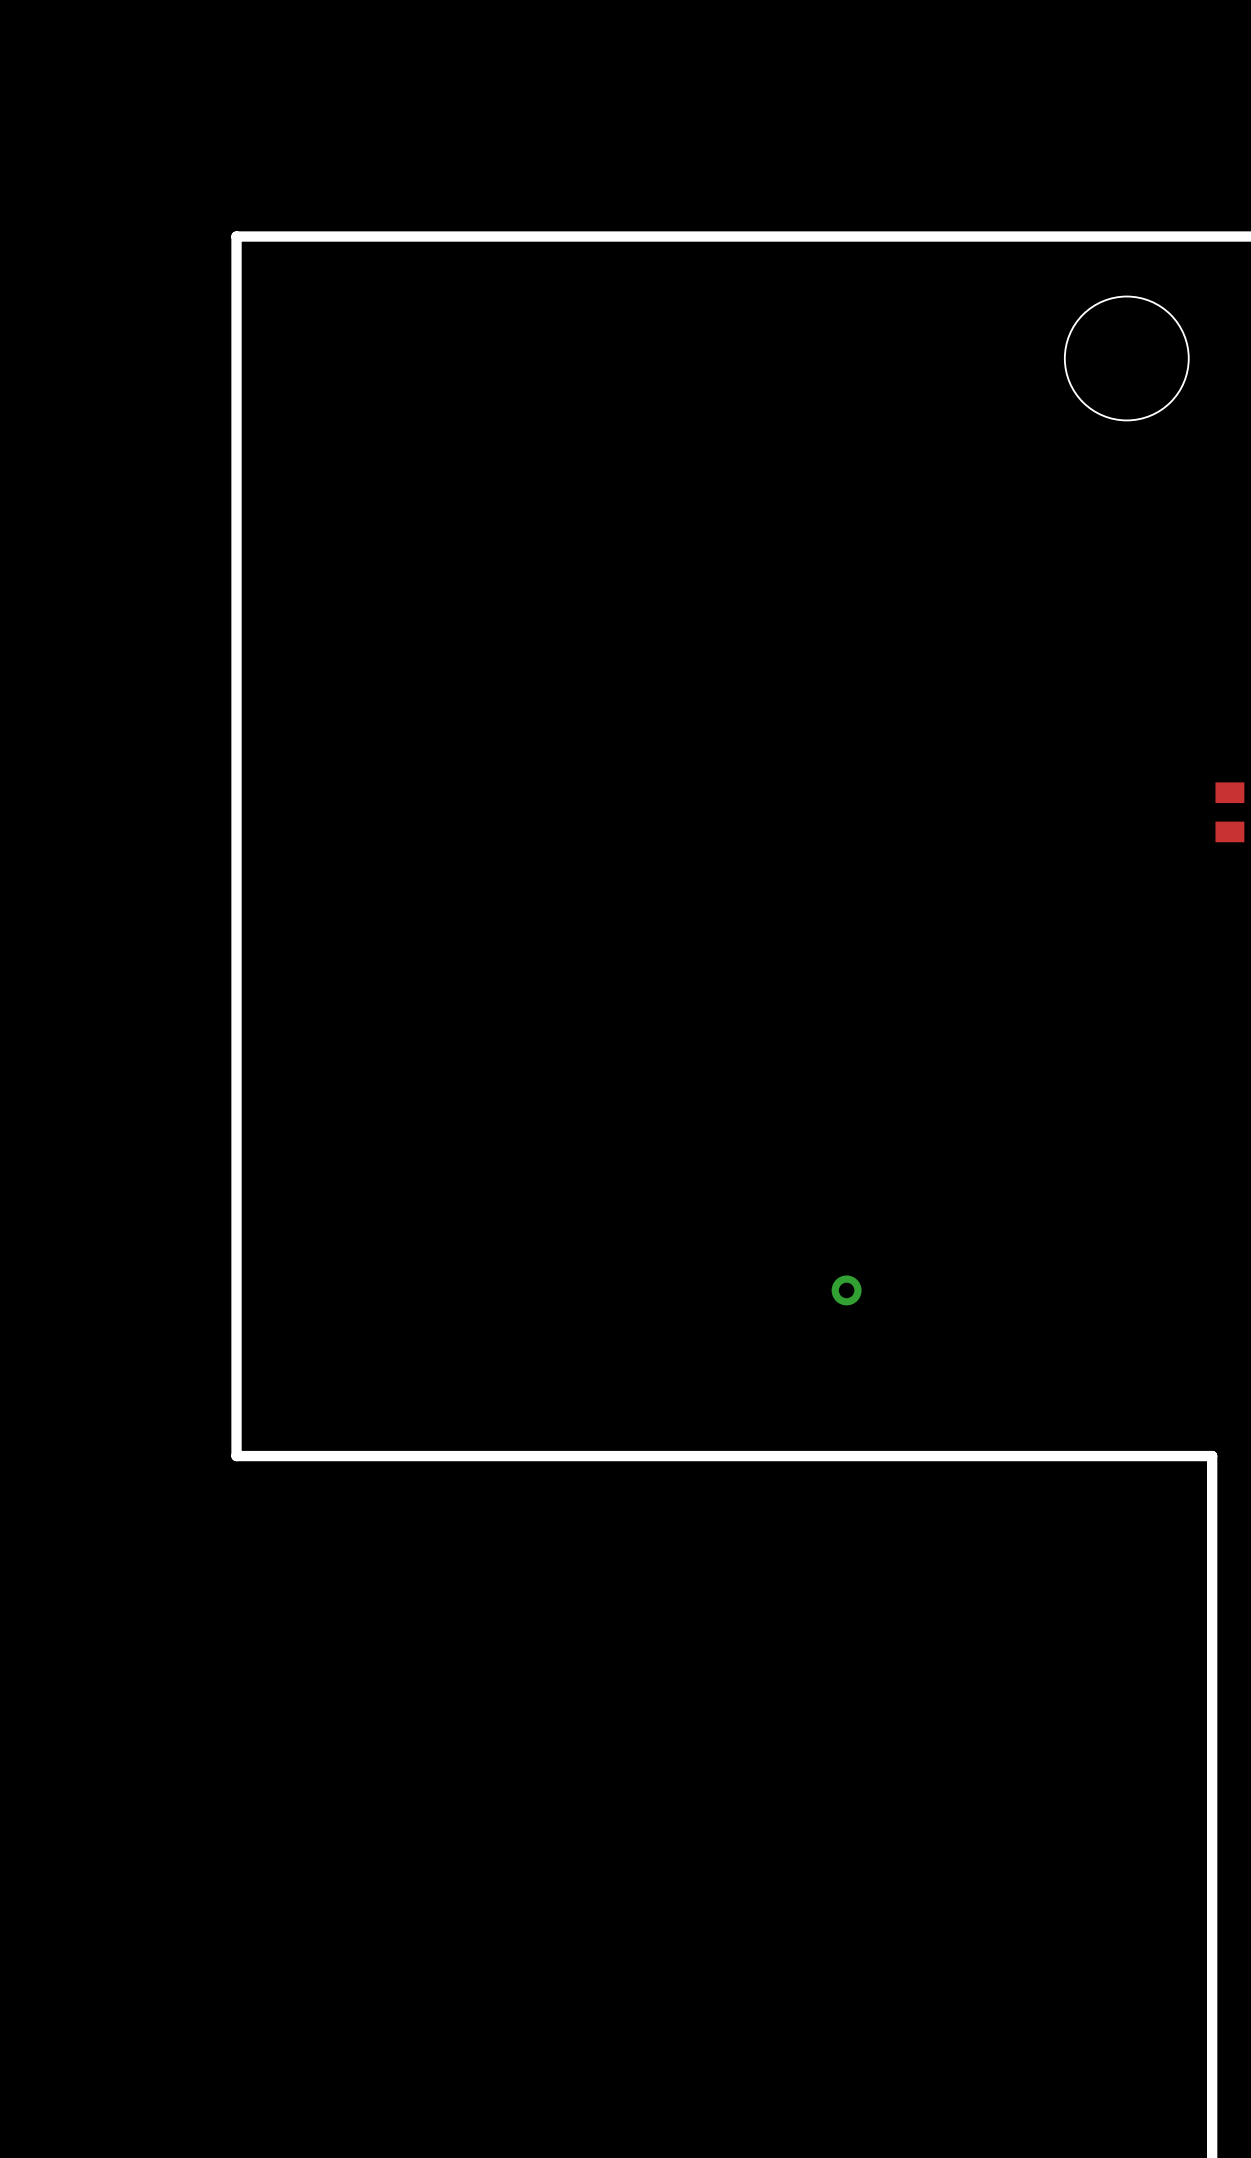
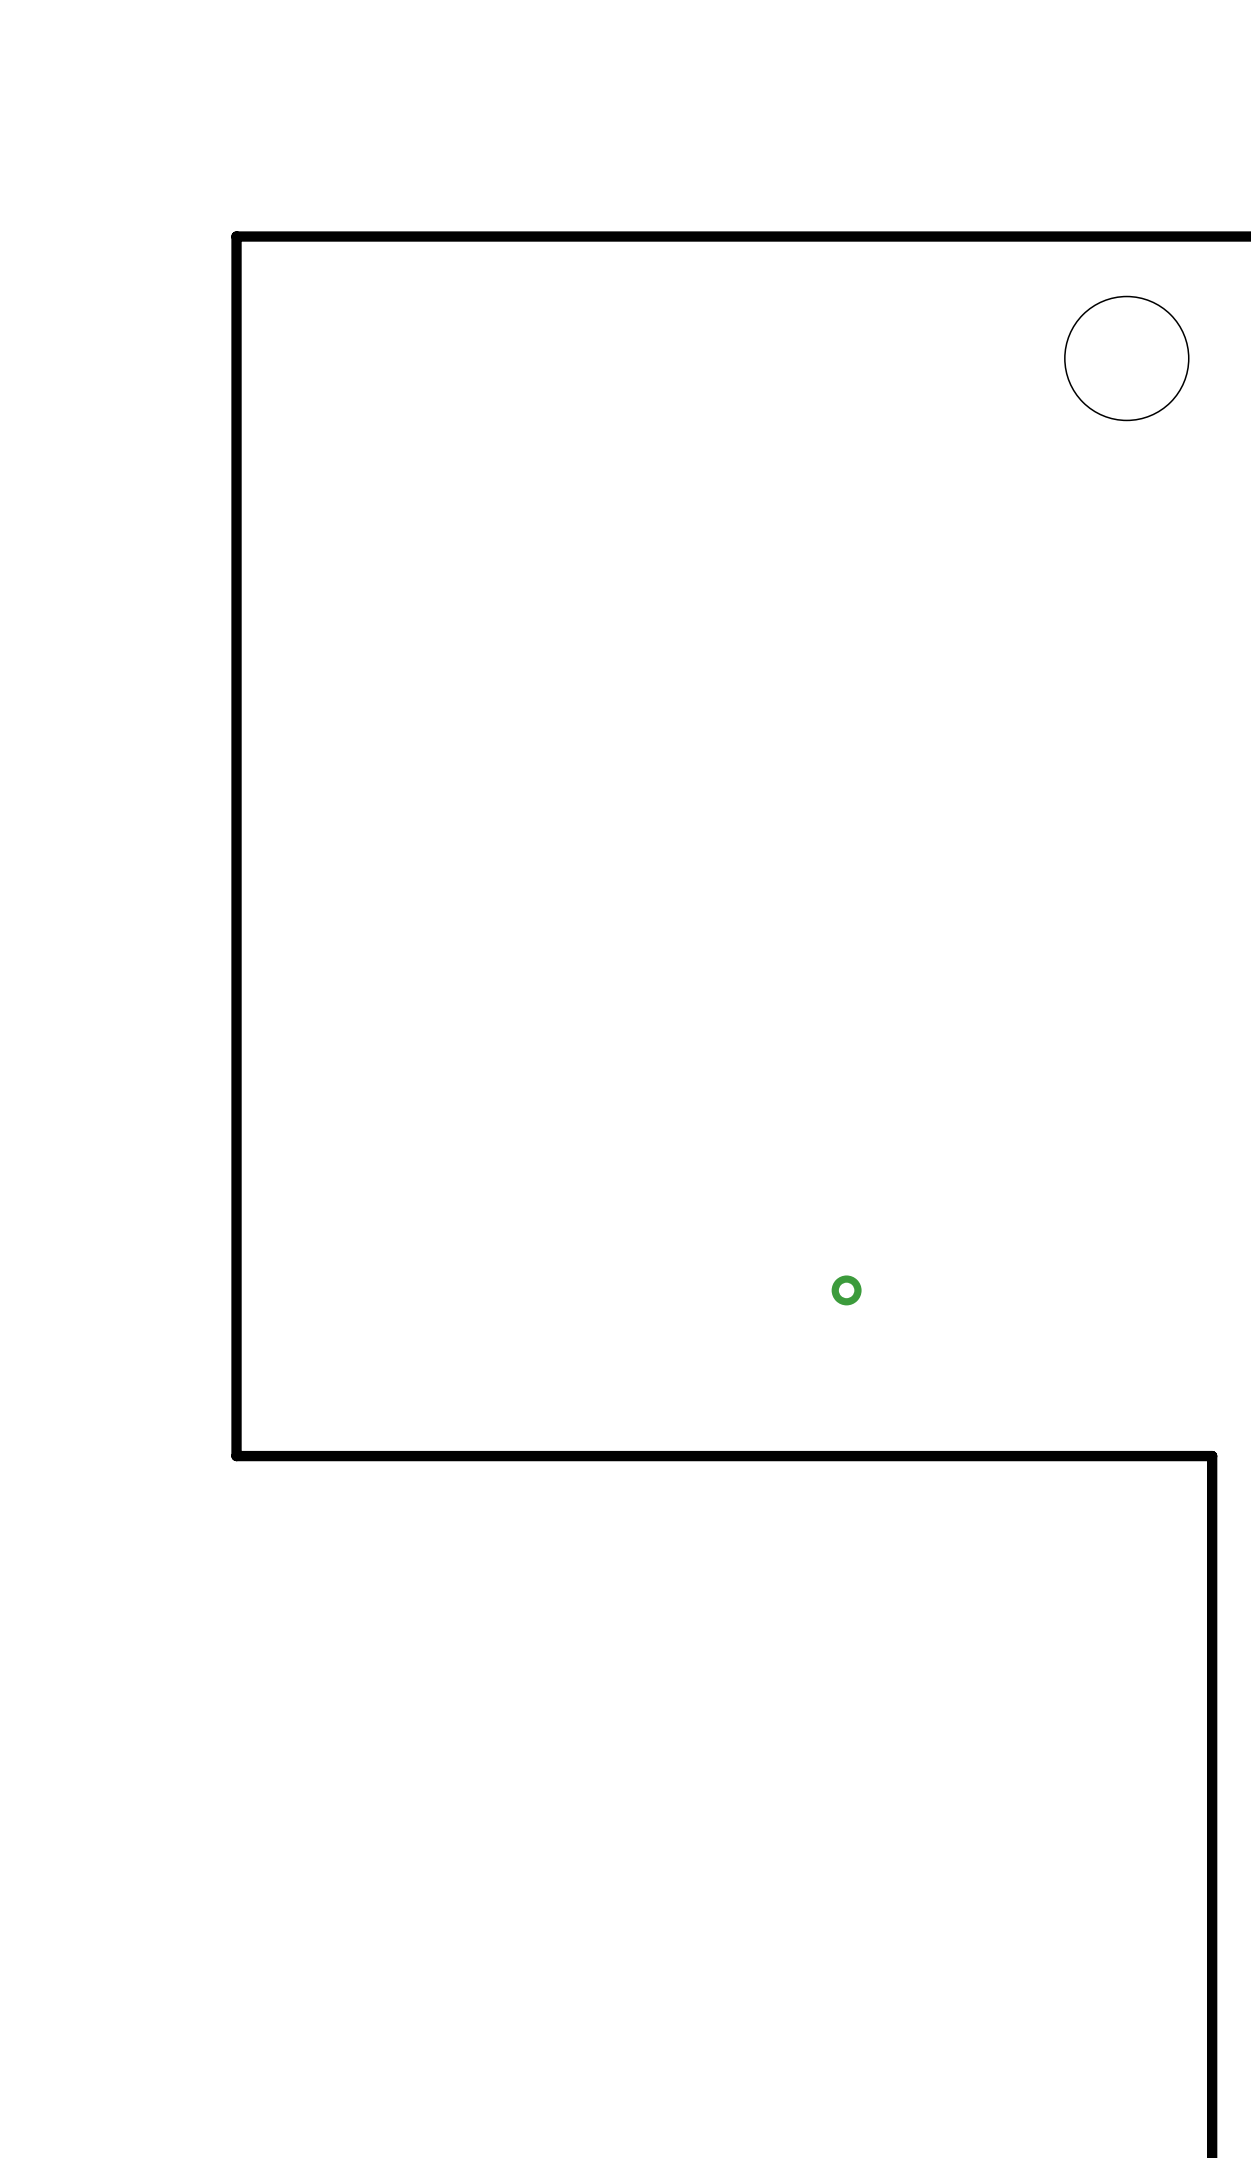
part: (1229, 812) -> none

